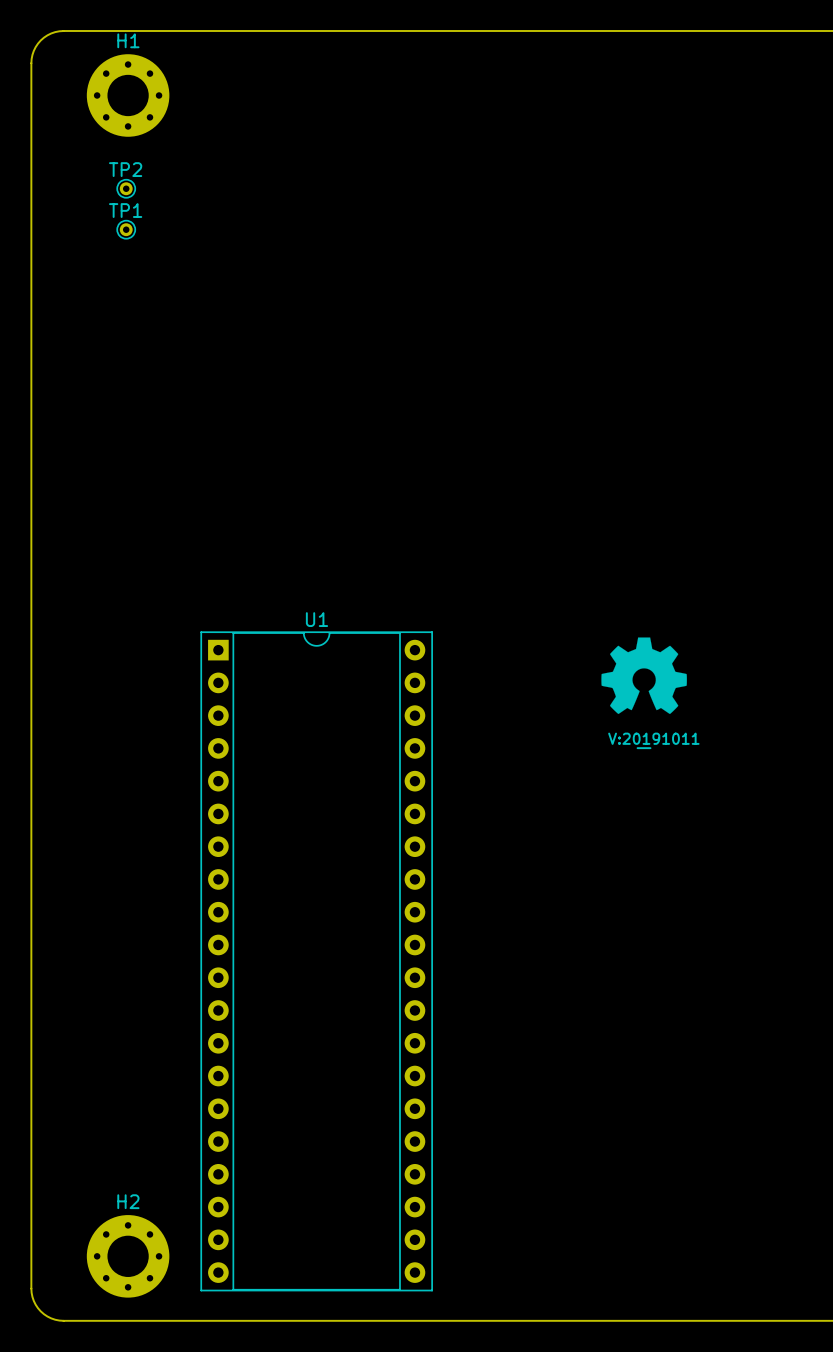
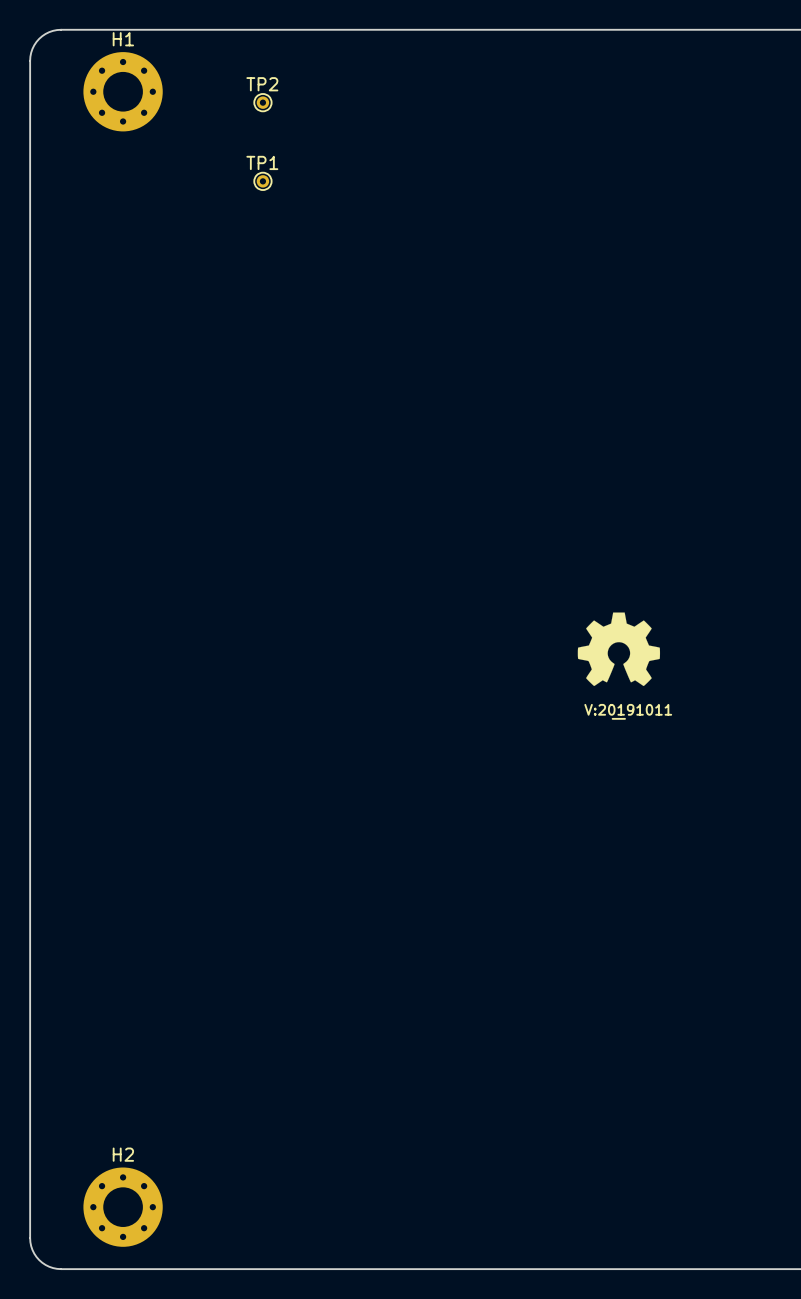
TP2 position: (126, 188) -> (262, 102)
TP1 position: (126, 229) -> (262, 181)
U1: (316, 961) -> none

